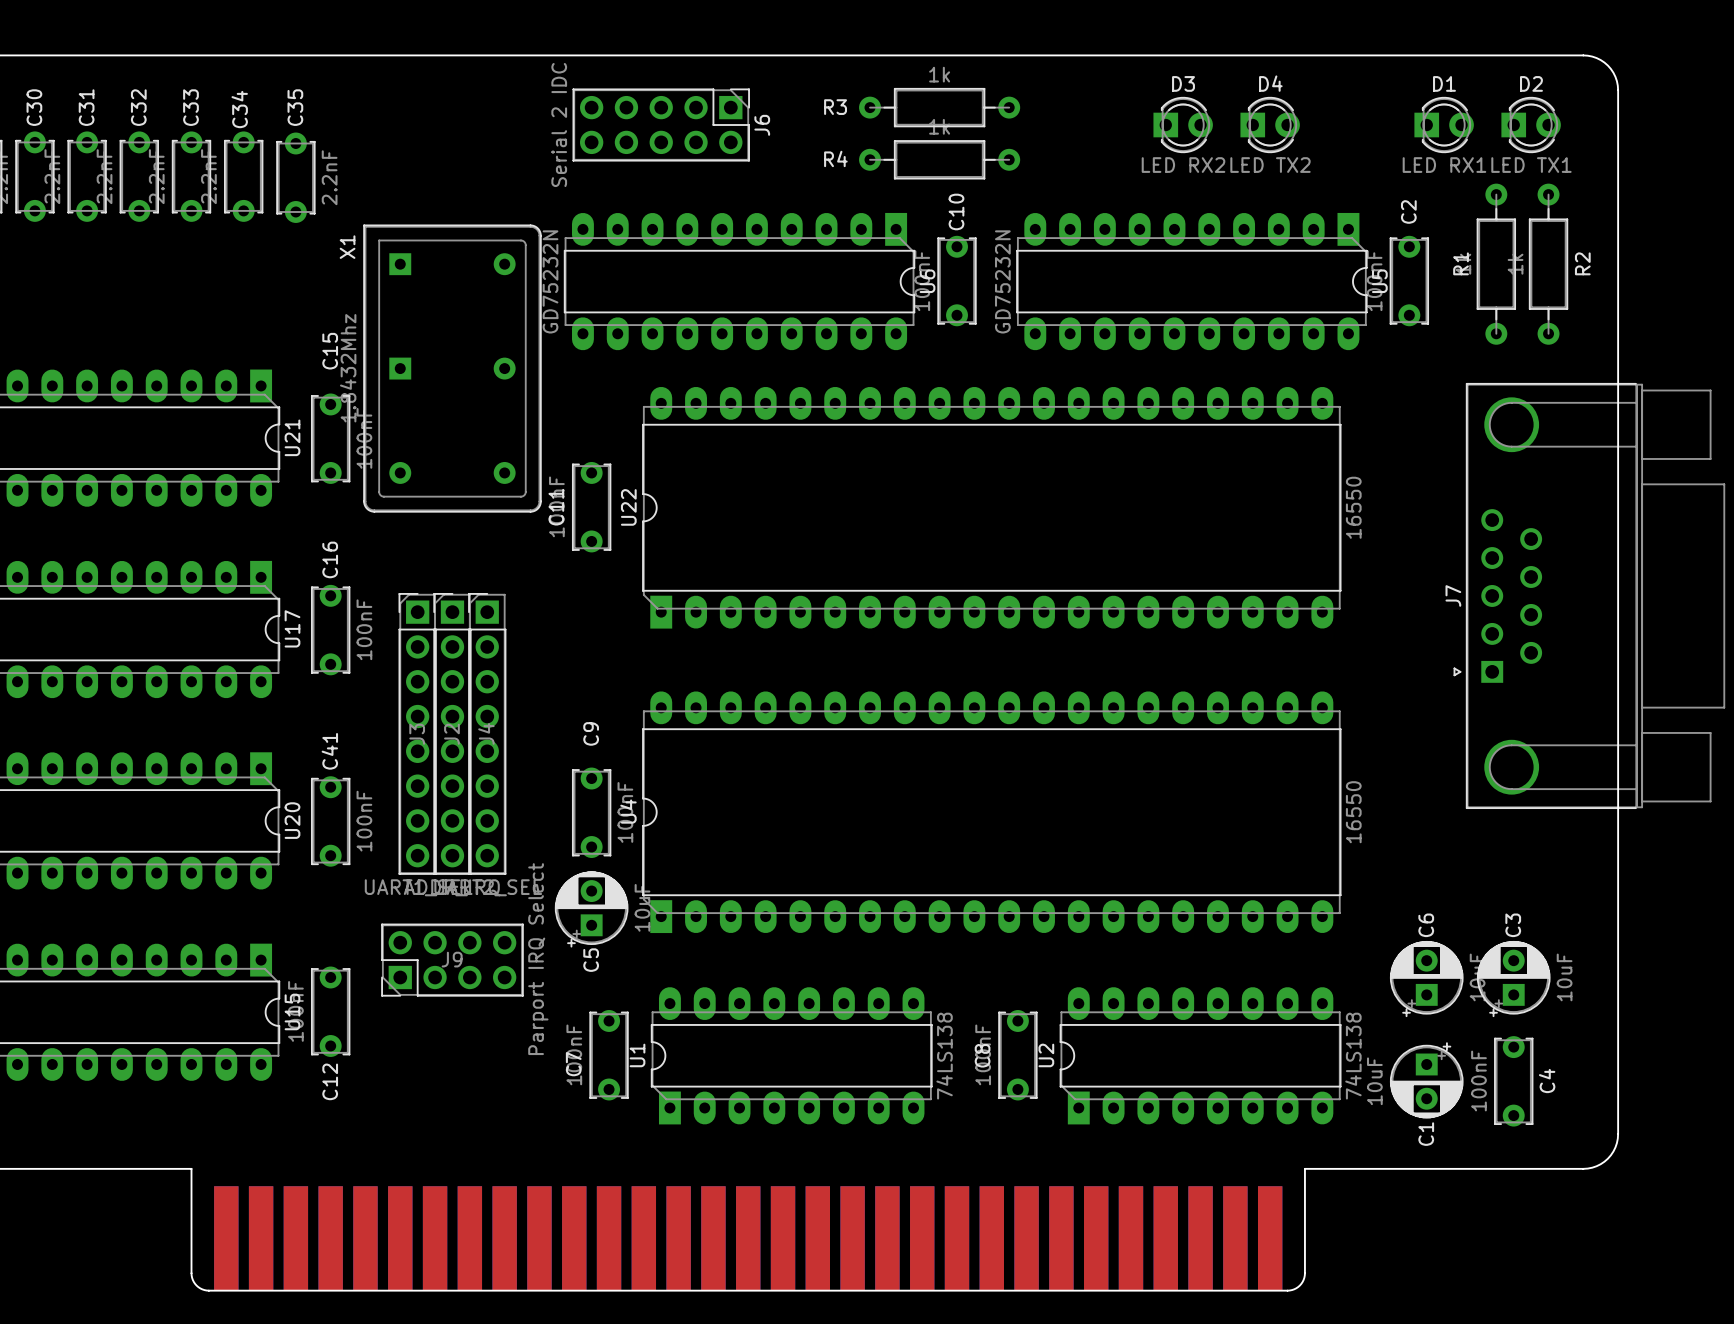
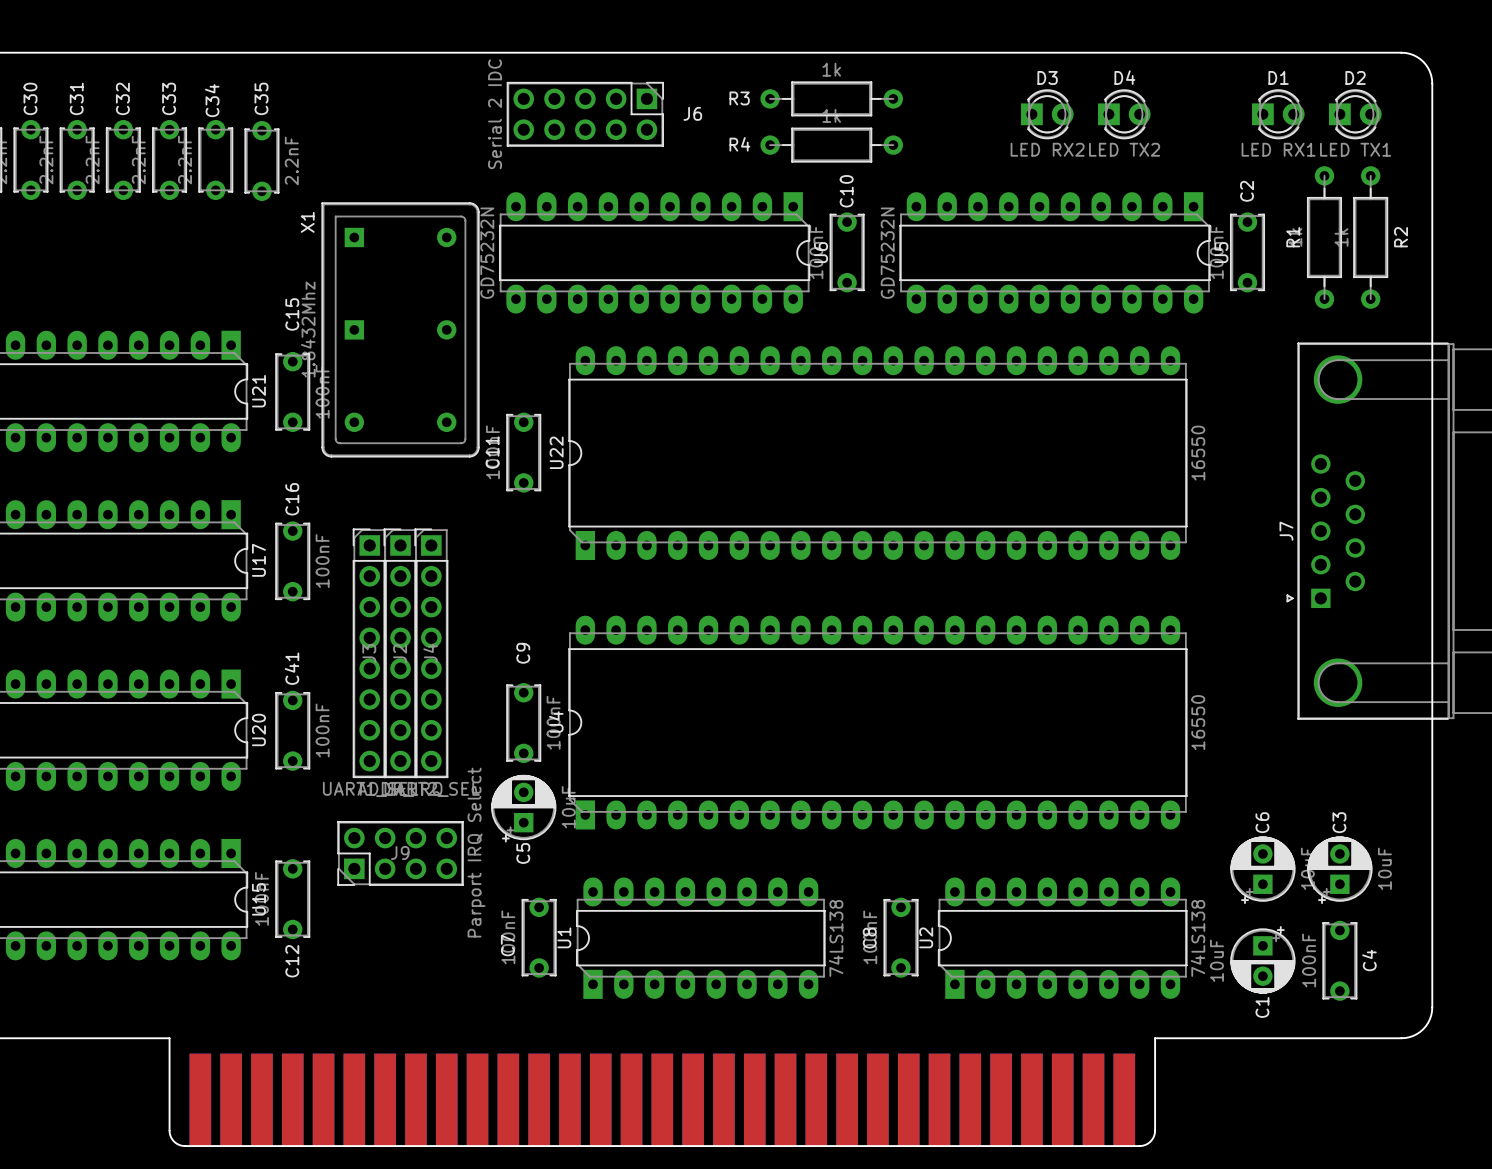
J6 name rotation: 0° (762, 125) -> 90° clockwise (692, 113)

